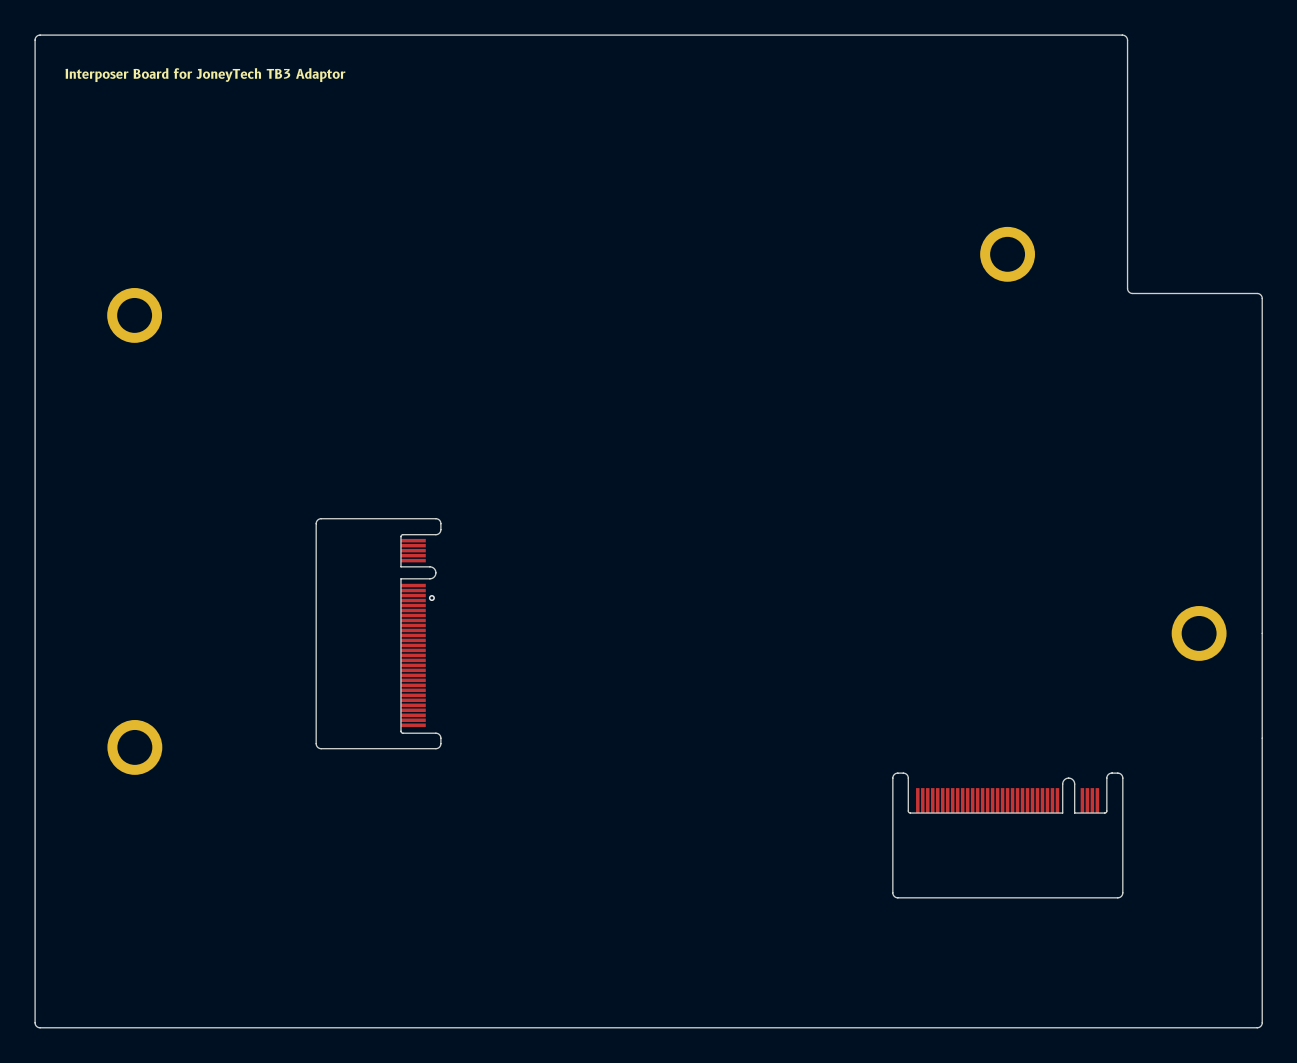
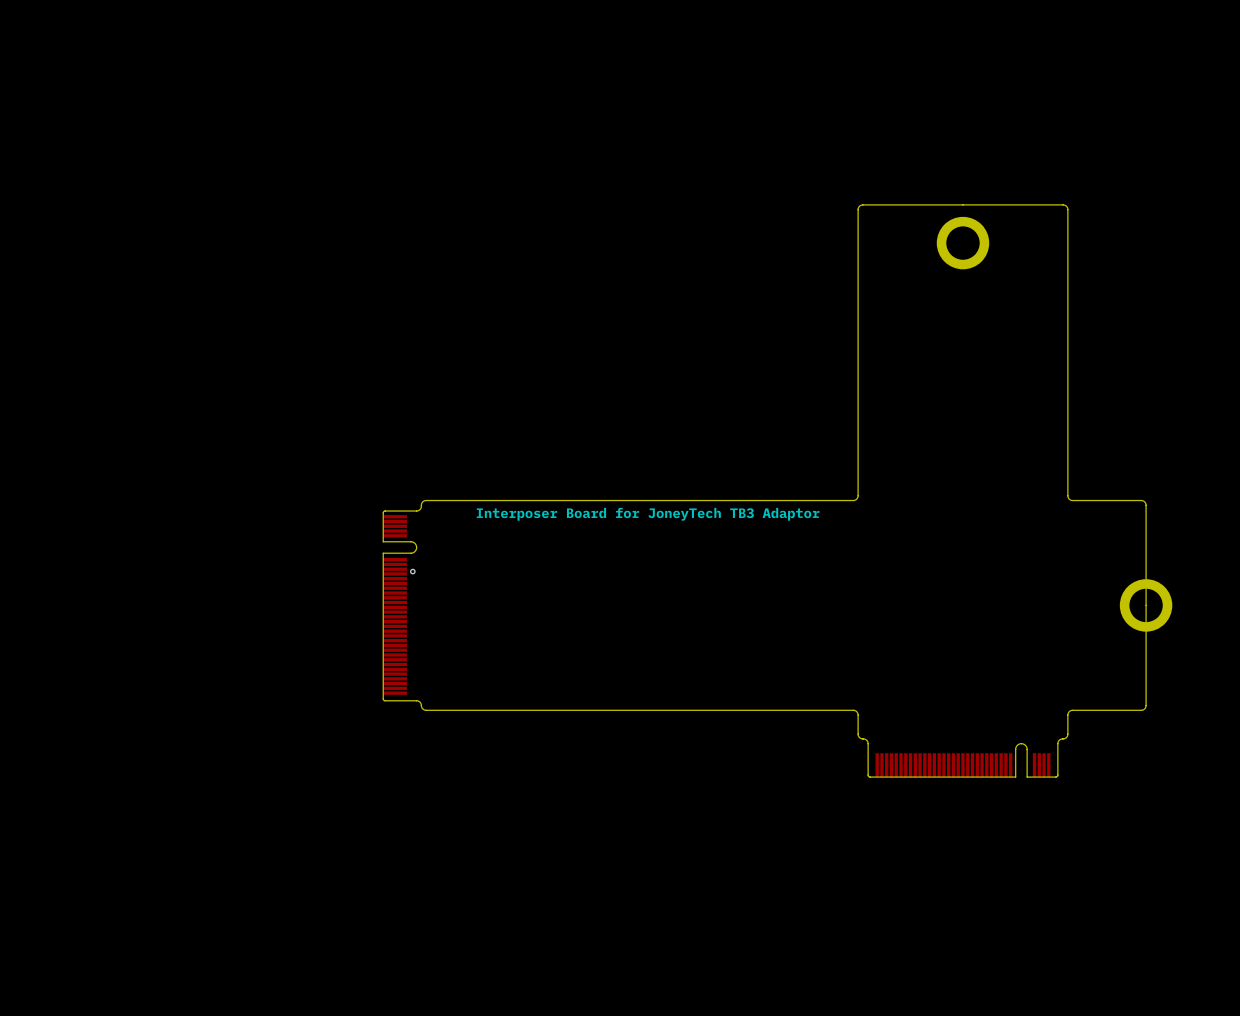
board edge: (40, 35) (1125, 36) (1127, 40) (1128, 290) (1132, 293) (1257, 293) (1262, 297) (1261, 1025) (1257, 1027) (36, 1026) (35, 1022) (35, 40) (40, 35) -> none
text: Interposer Board for JoneyTech TB3 Adaptor (205, 75) -> none
part: (134, 315) -> none
board edge: (440, 528) (440, 521) (435, 518) (321, 518) (316, 521) (316, 743) (321, 748) (435, 748) (440, 745) (440, 738) -> (862, 738) (858, 735) (857, 714) (853, 710) (426, 710) (421, 705)
text: none -> Interposer Board for JoneyTech TB3 Adaptor (648, 514)
part: (134, 747) -> none
board edge: (902, 773) (895, 773) (892, 777) (892, 892) (895, 897) (1117, 897) (1122, 892) (1122, 778) (1119, 773) (1112, 773) -> (421, 505) (426, 500) (855, 500) (858, 495) (859, 206) (862, 204) (1064, 205) (1067, 209) (1067, 496) (1072, 500) (1141, 500) (1145, 503) (1146, 705) (1141, 710) (1071, 710) (1067, 714) (1067, 735) (1063, 738)

